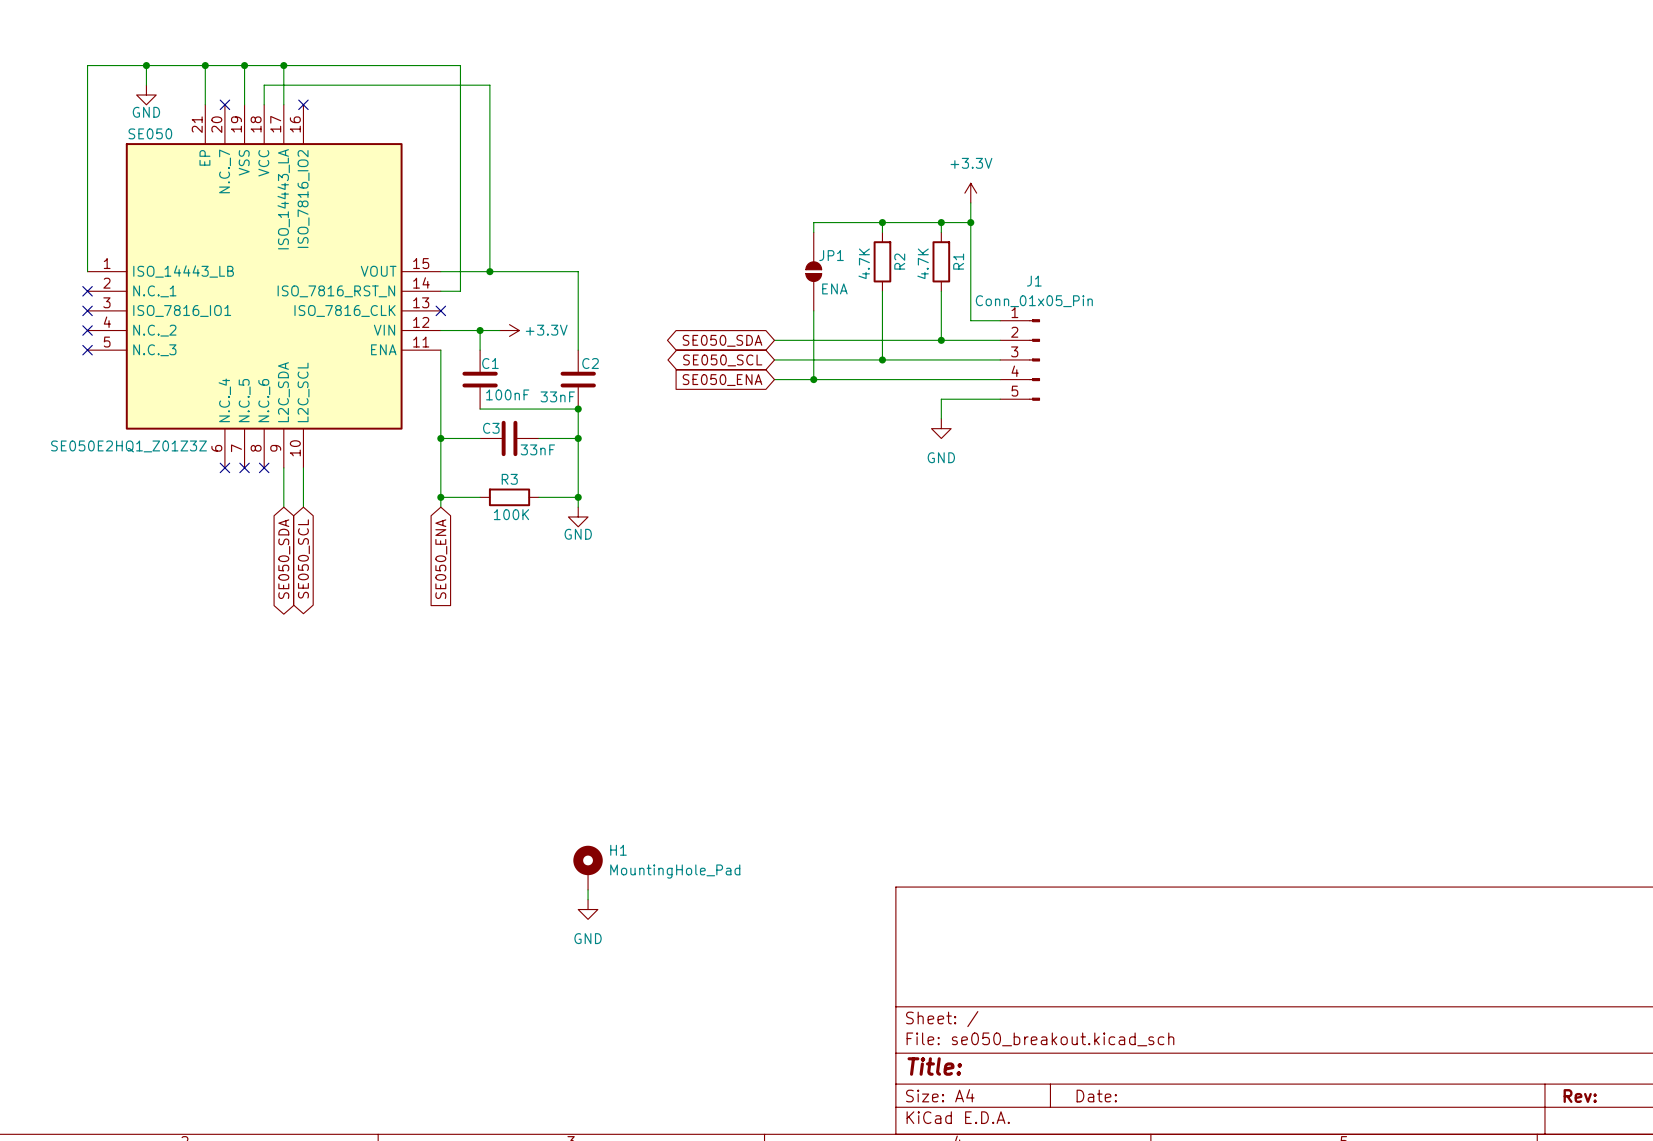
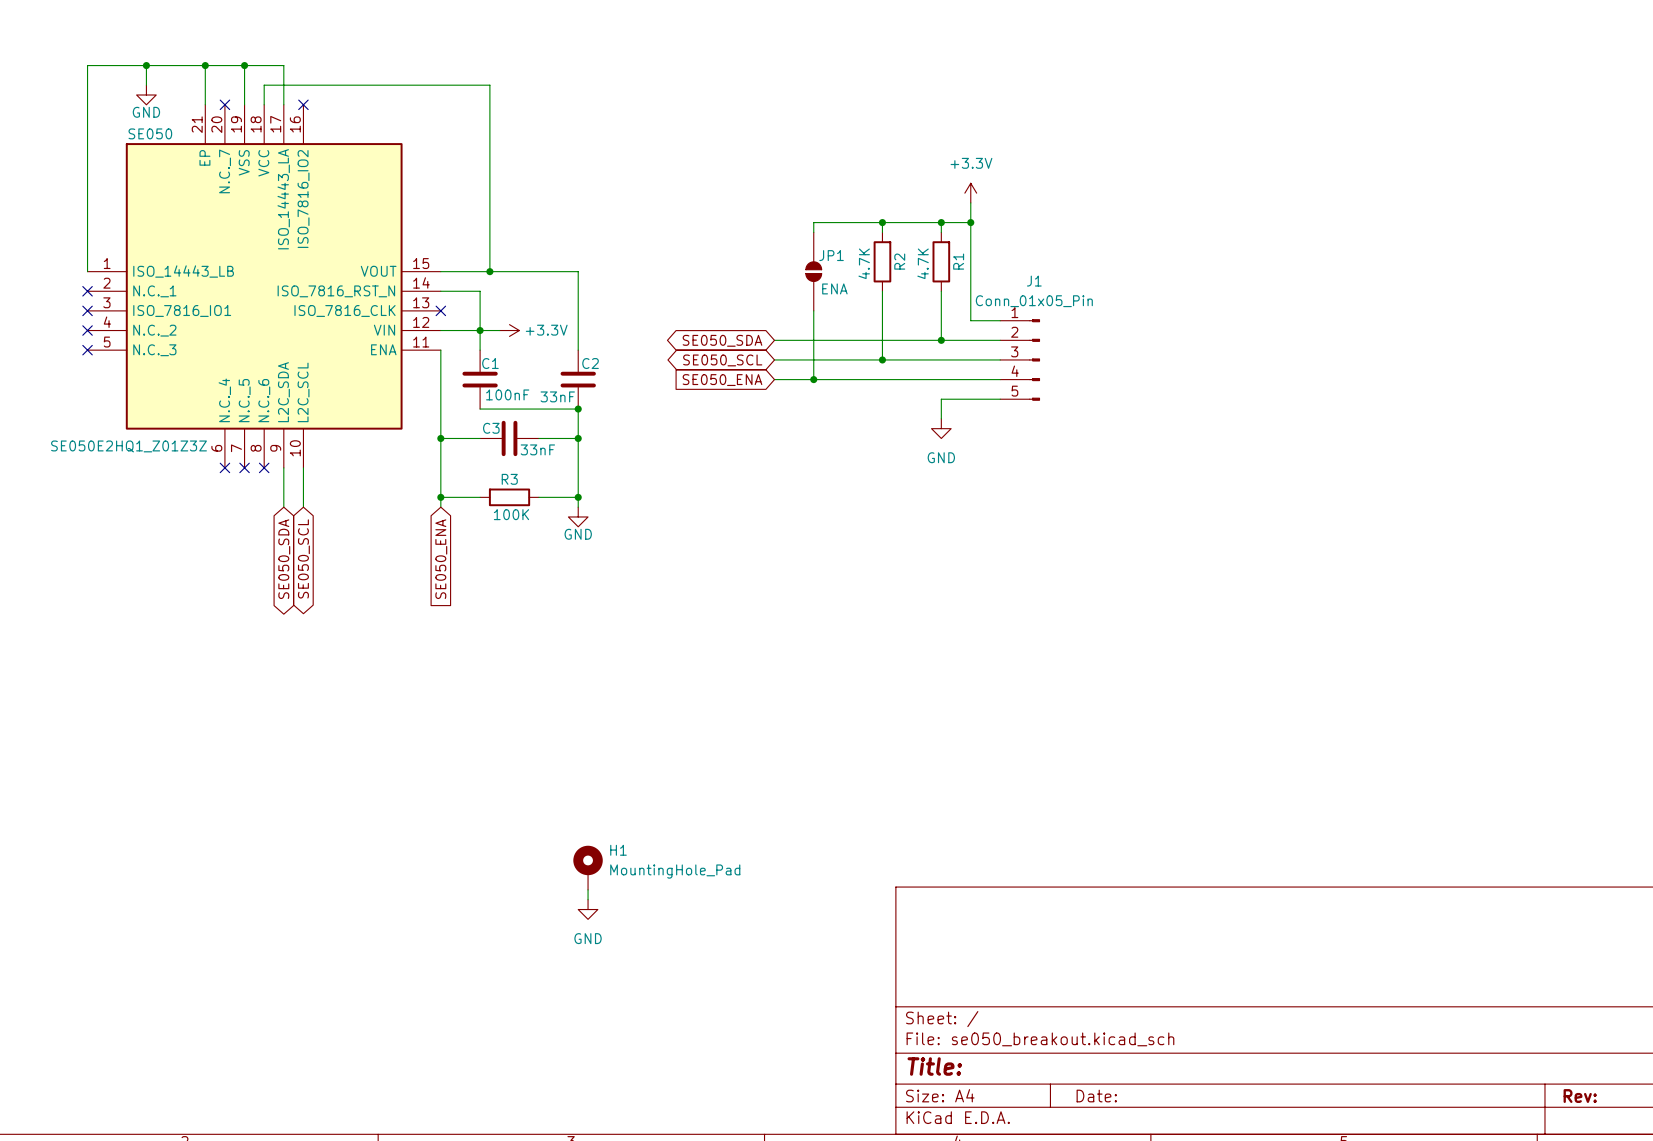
wire: (283, 65) (460, 65) (460, 291) -> (480, 330) (480, 291) (460, 291)
junction: (283, 65) -> none

